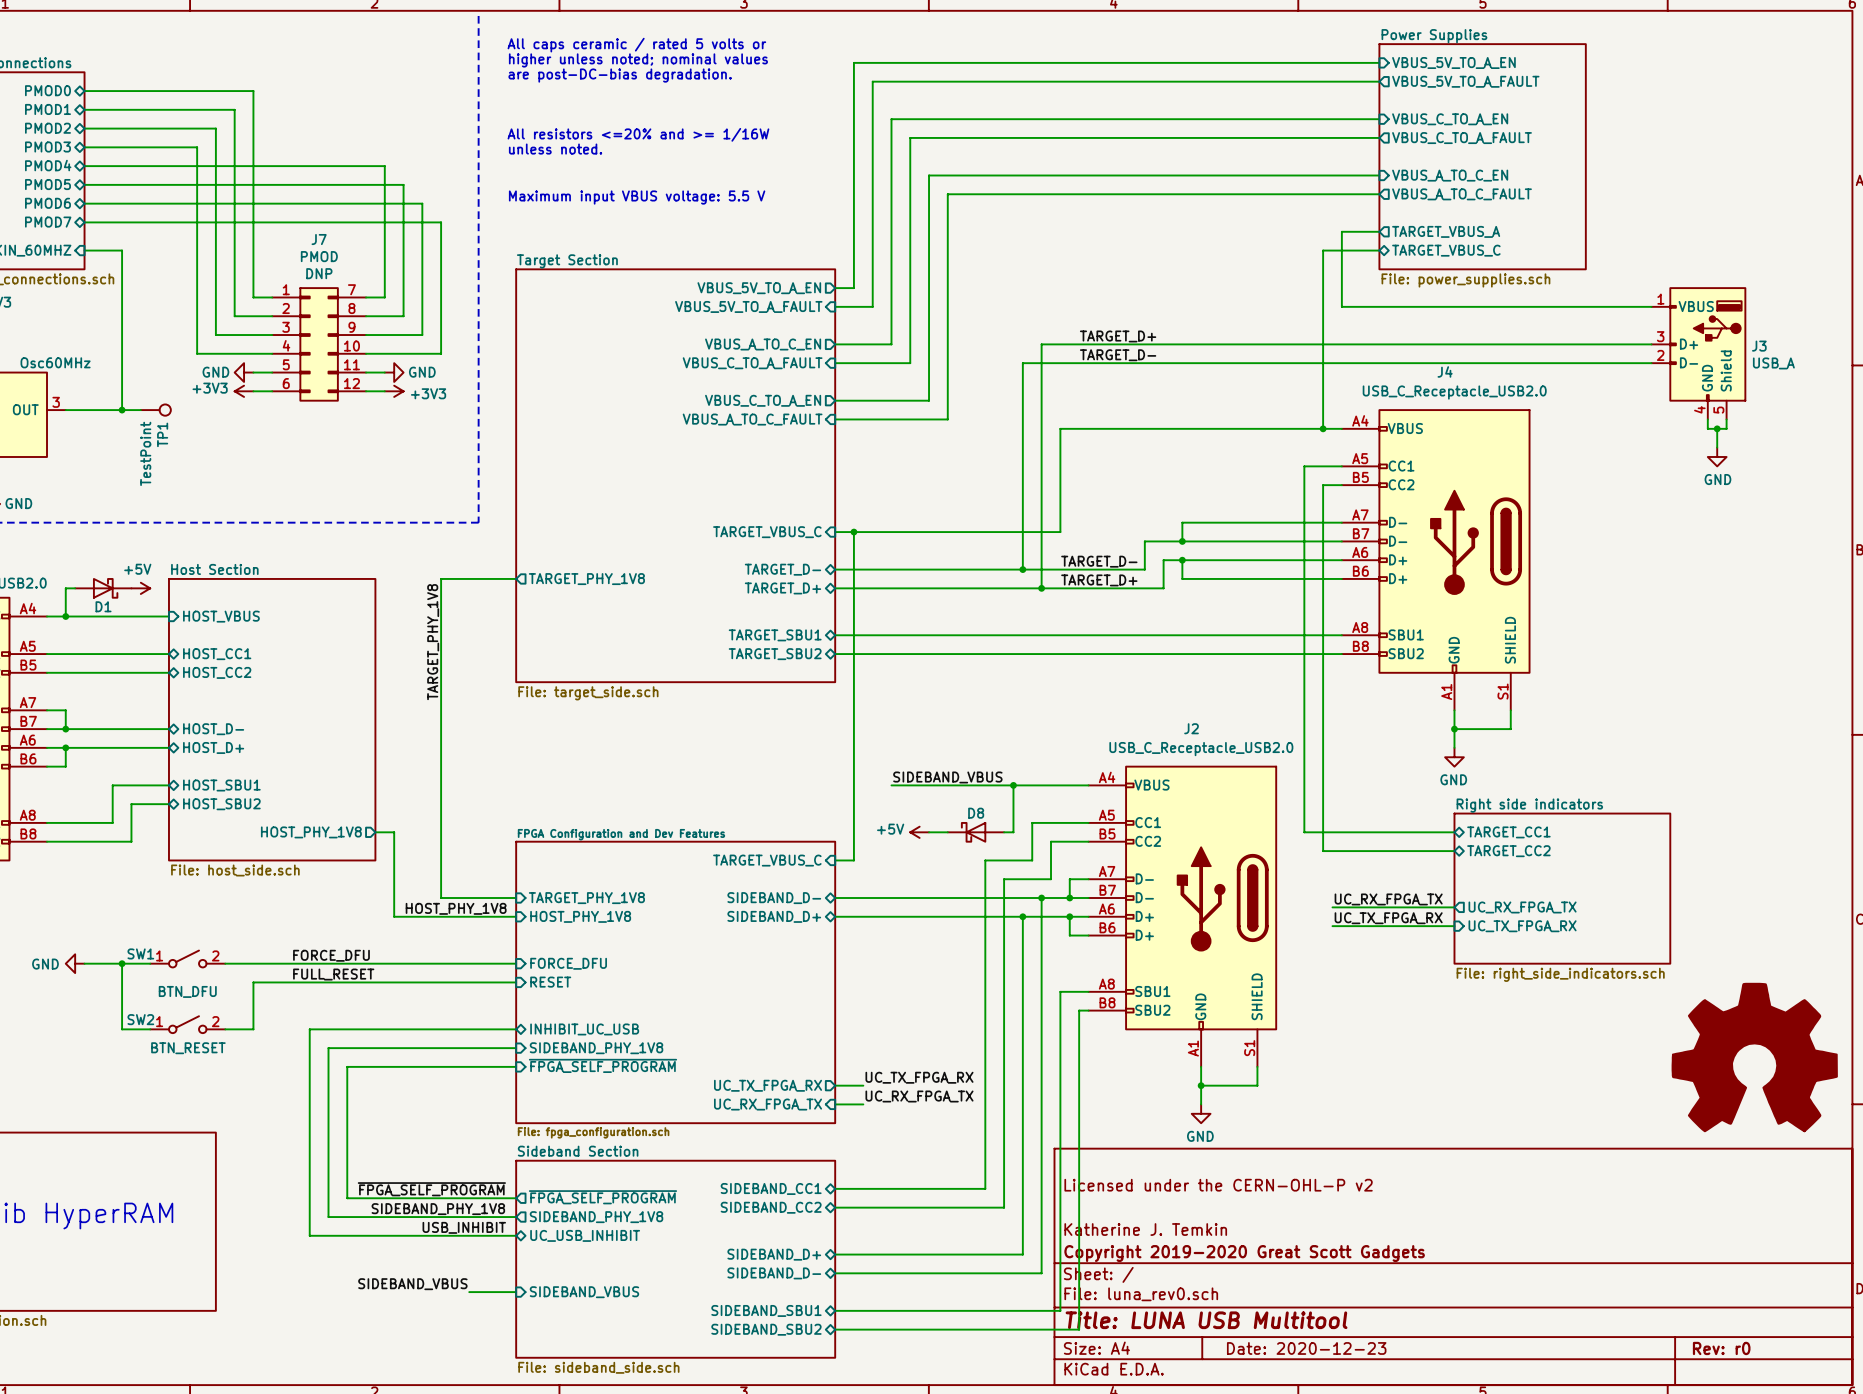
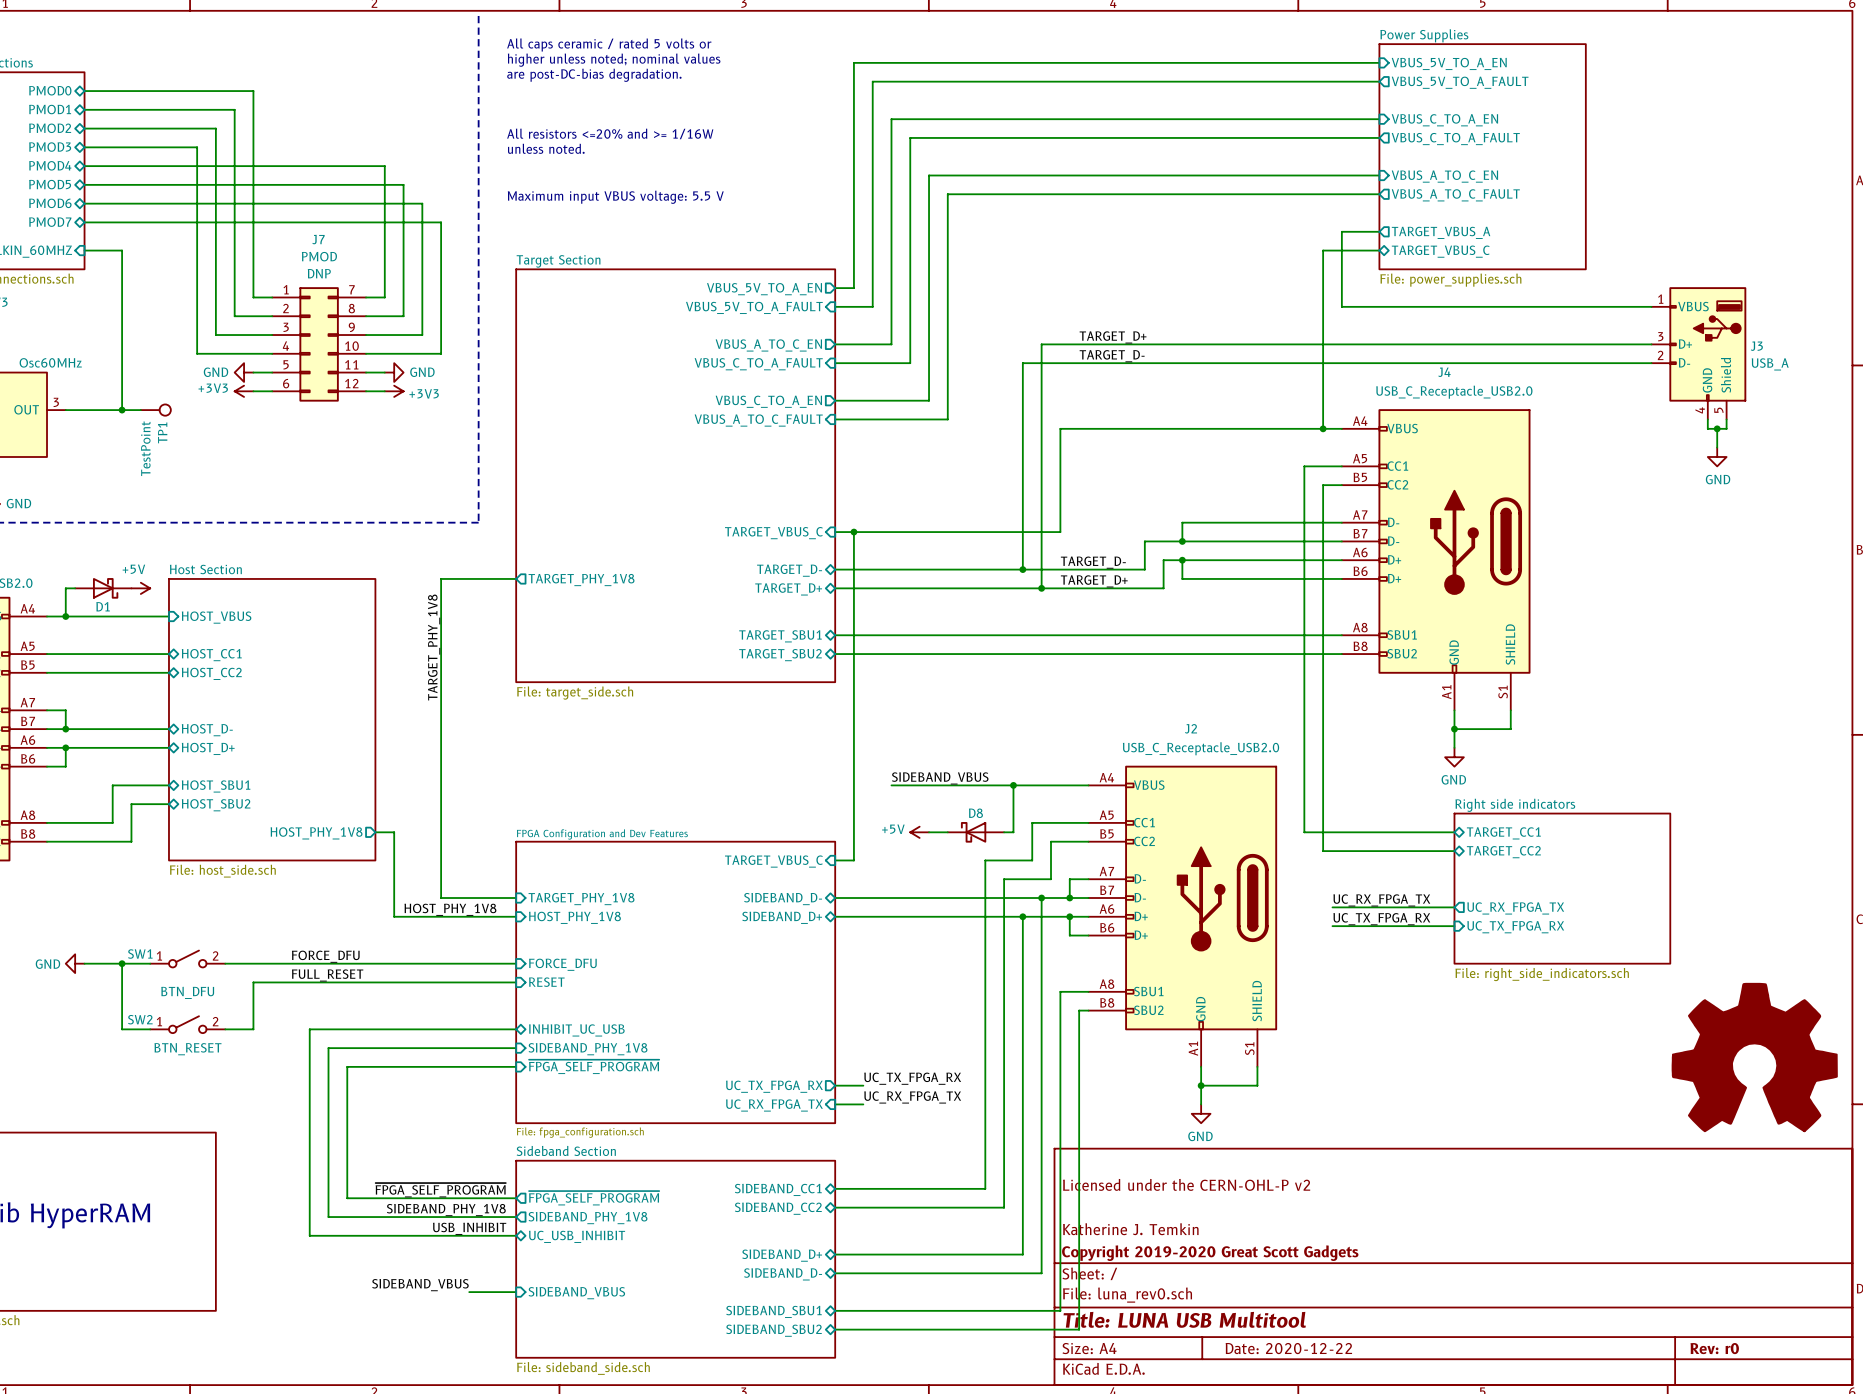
title block: Date: 2020-12-23 (1306, 1348) -> Date: 2020-12-22 (1288, 1348)

